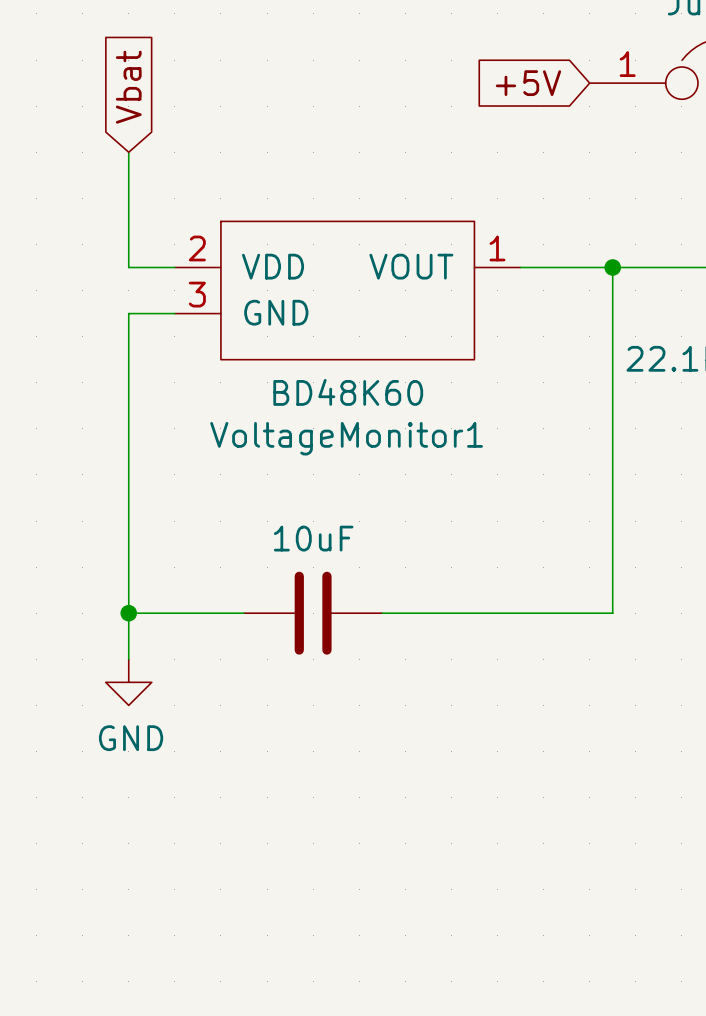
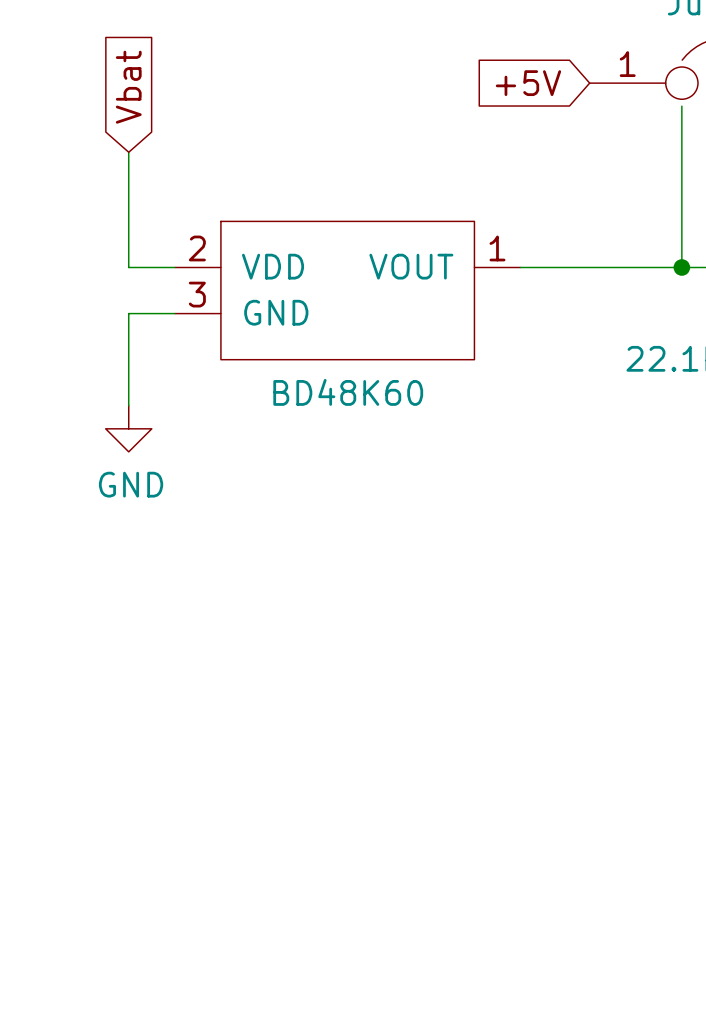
wire: none -> (681, 106) (681, 267)
wire: (612, 267) (612, 613) (382, 613) -> none
junction: (612, 267) -> none
junction: none -> (681, 267)
wire: (128, 405) (128, 659) -> none
VoltageMonitor1 name: VoltageMonitor1 (346, 438) -> none
wire: (128, 613) (243, 613) -> none
junction: (128, 613) -> none
part: 10uF (313, 613) -> none
power symbol position: GND (128, 682) -> GND (128, 428)

